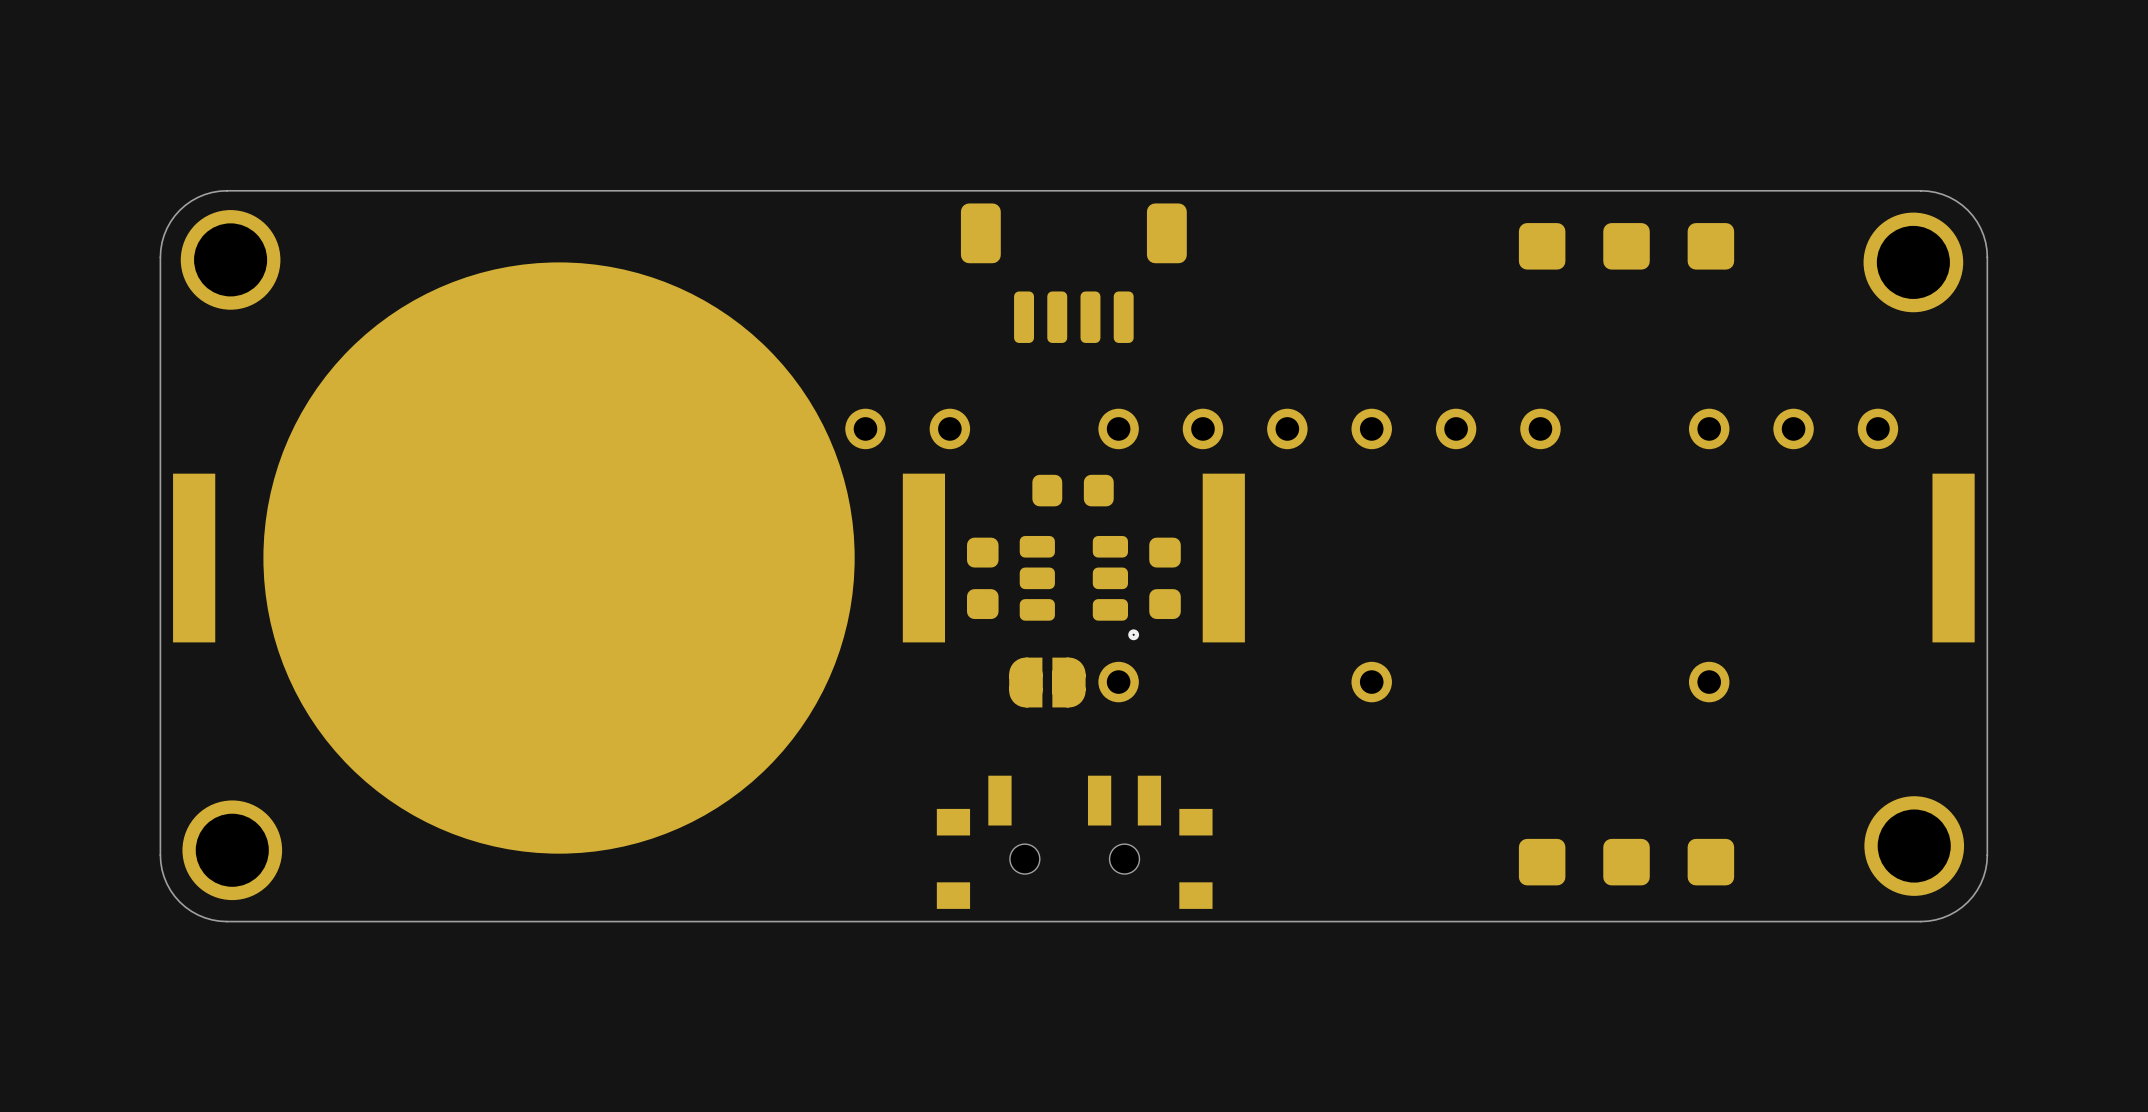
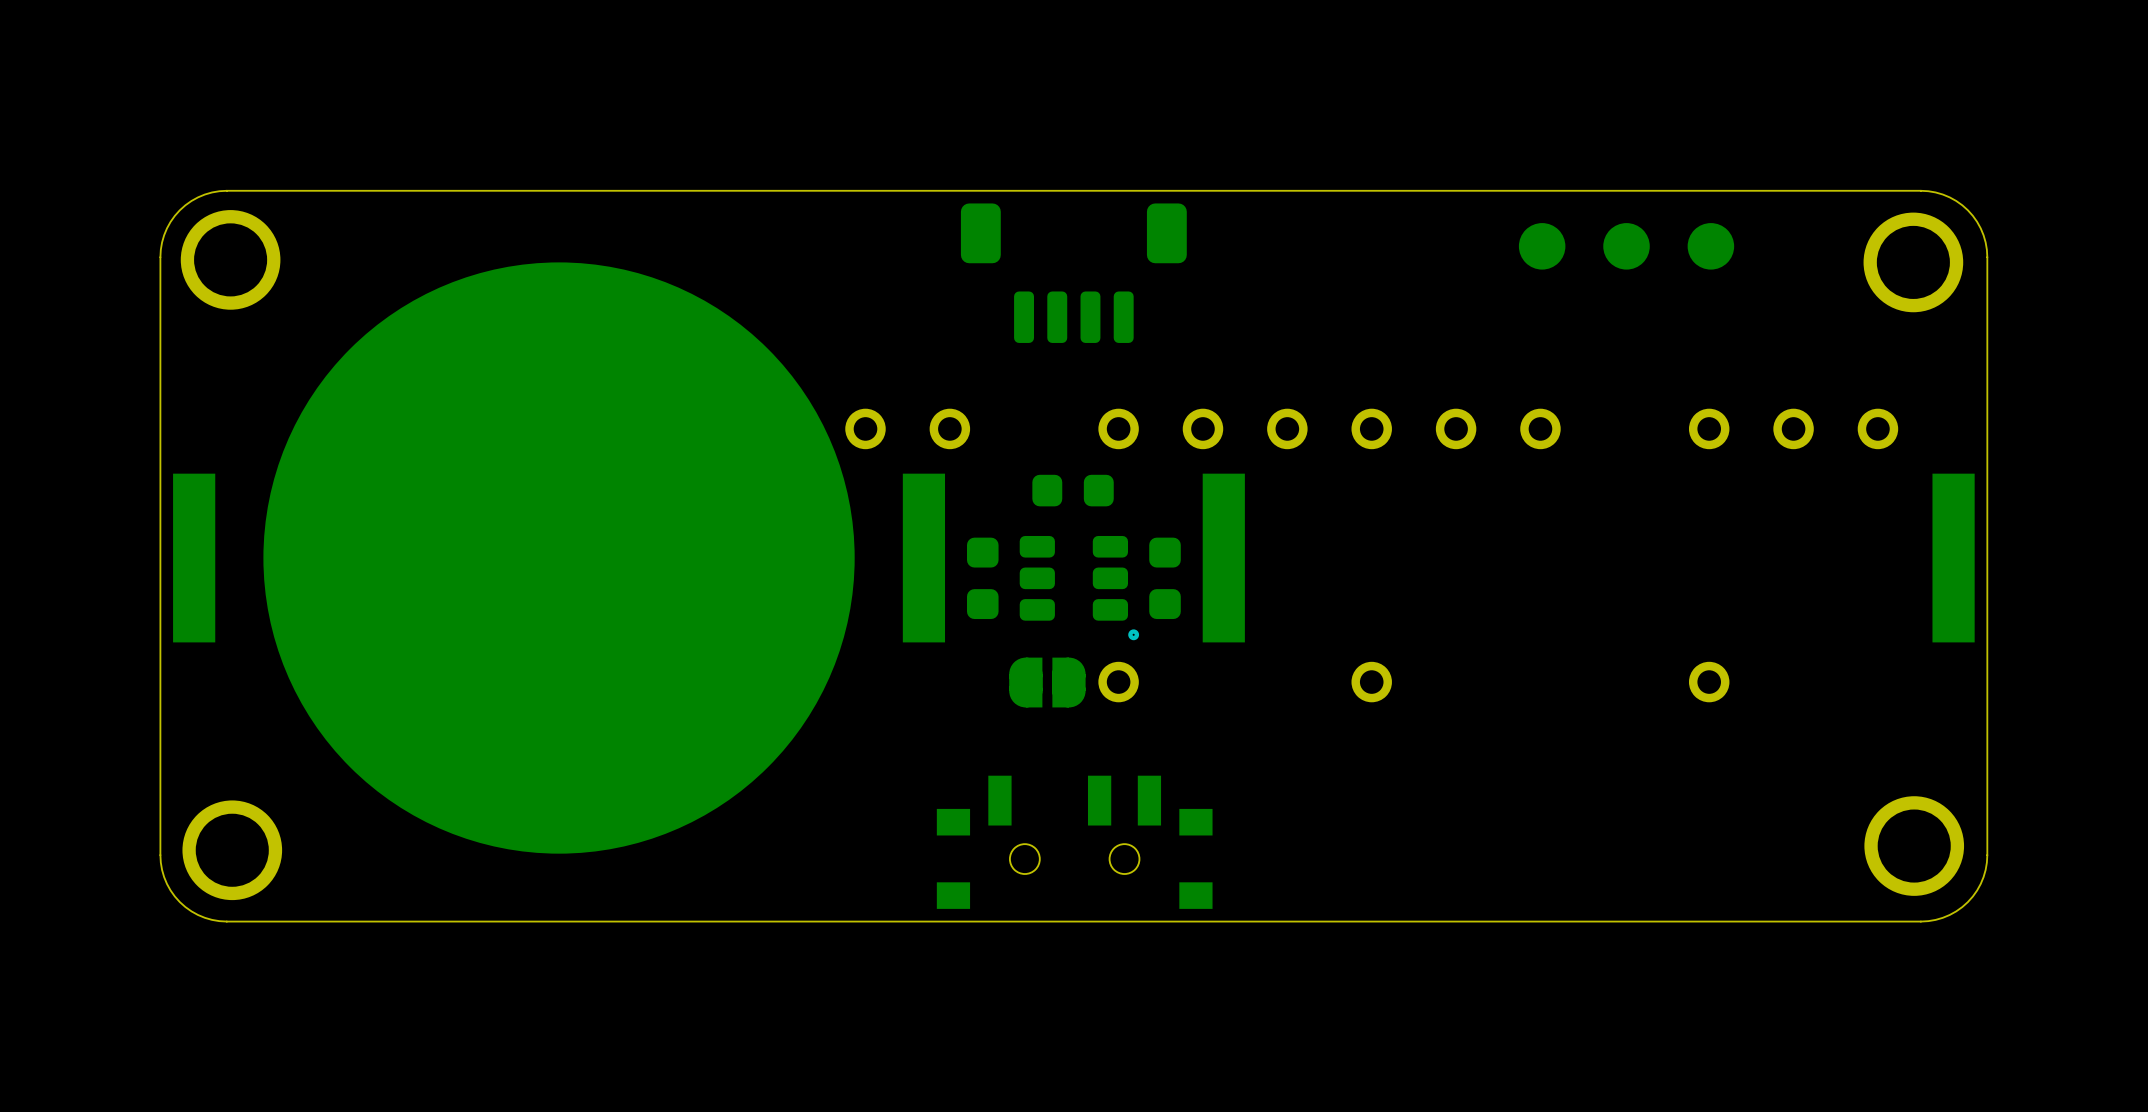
part footprint: [1518, 223, 1735, 270] -> [1518, 223, 1735, 270]
part: (1626, 862) -> none

